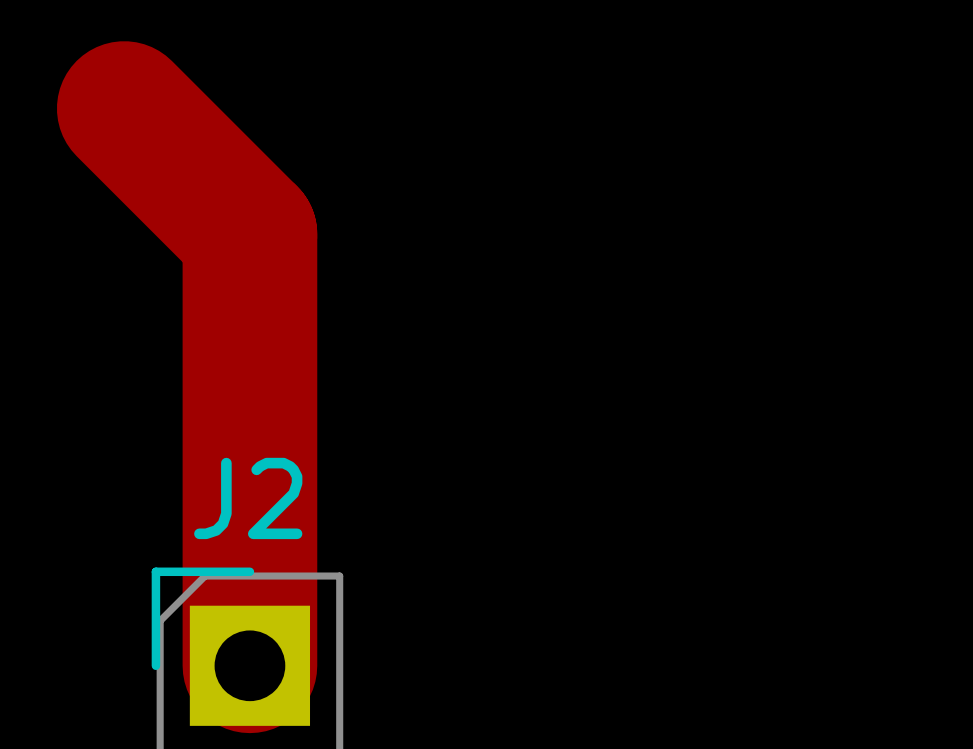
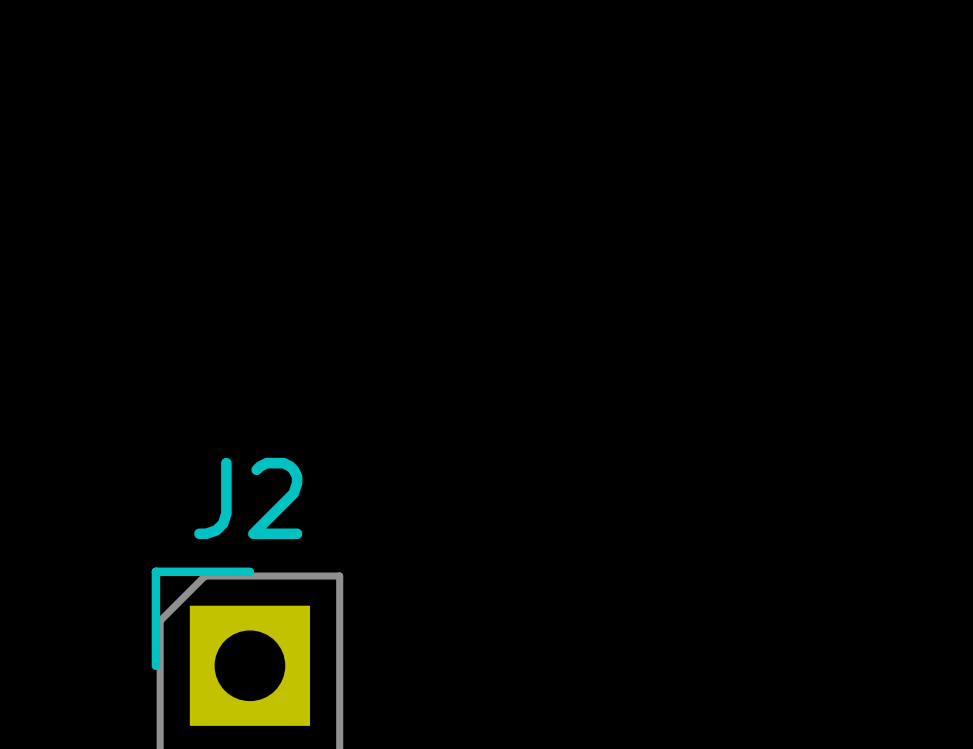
track: (124, 108) (249, 234) (249, 665) -> none

